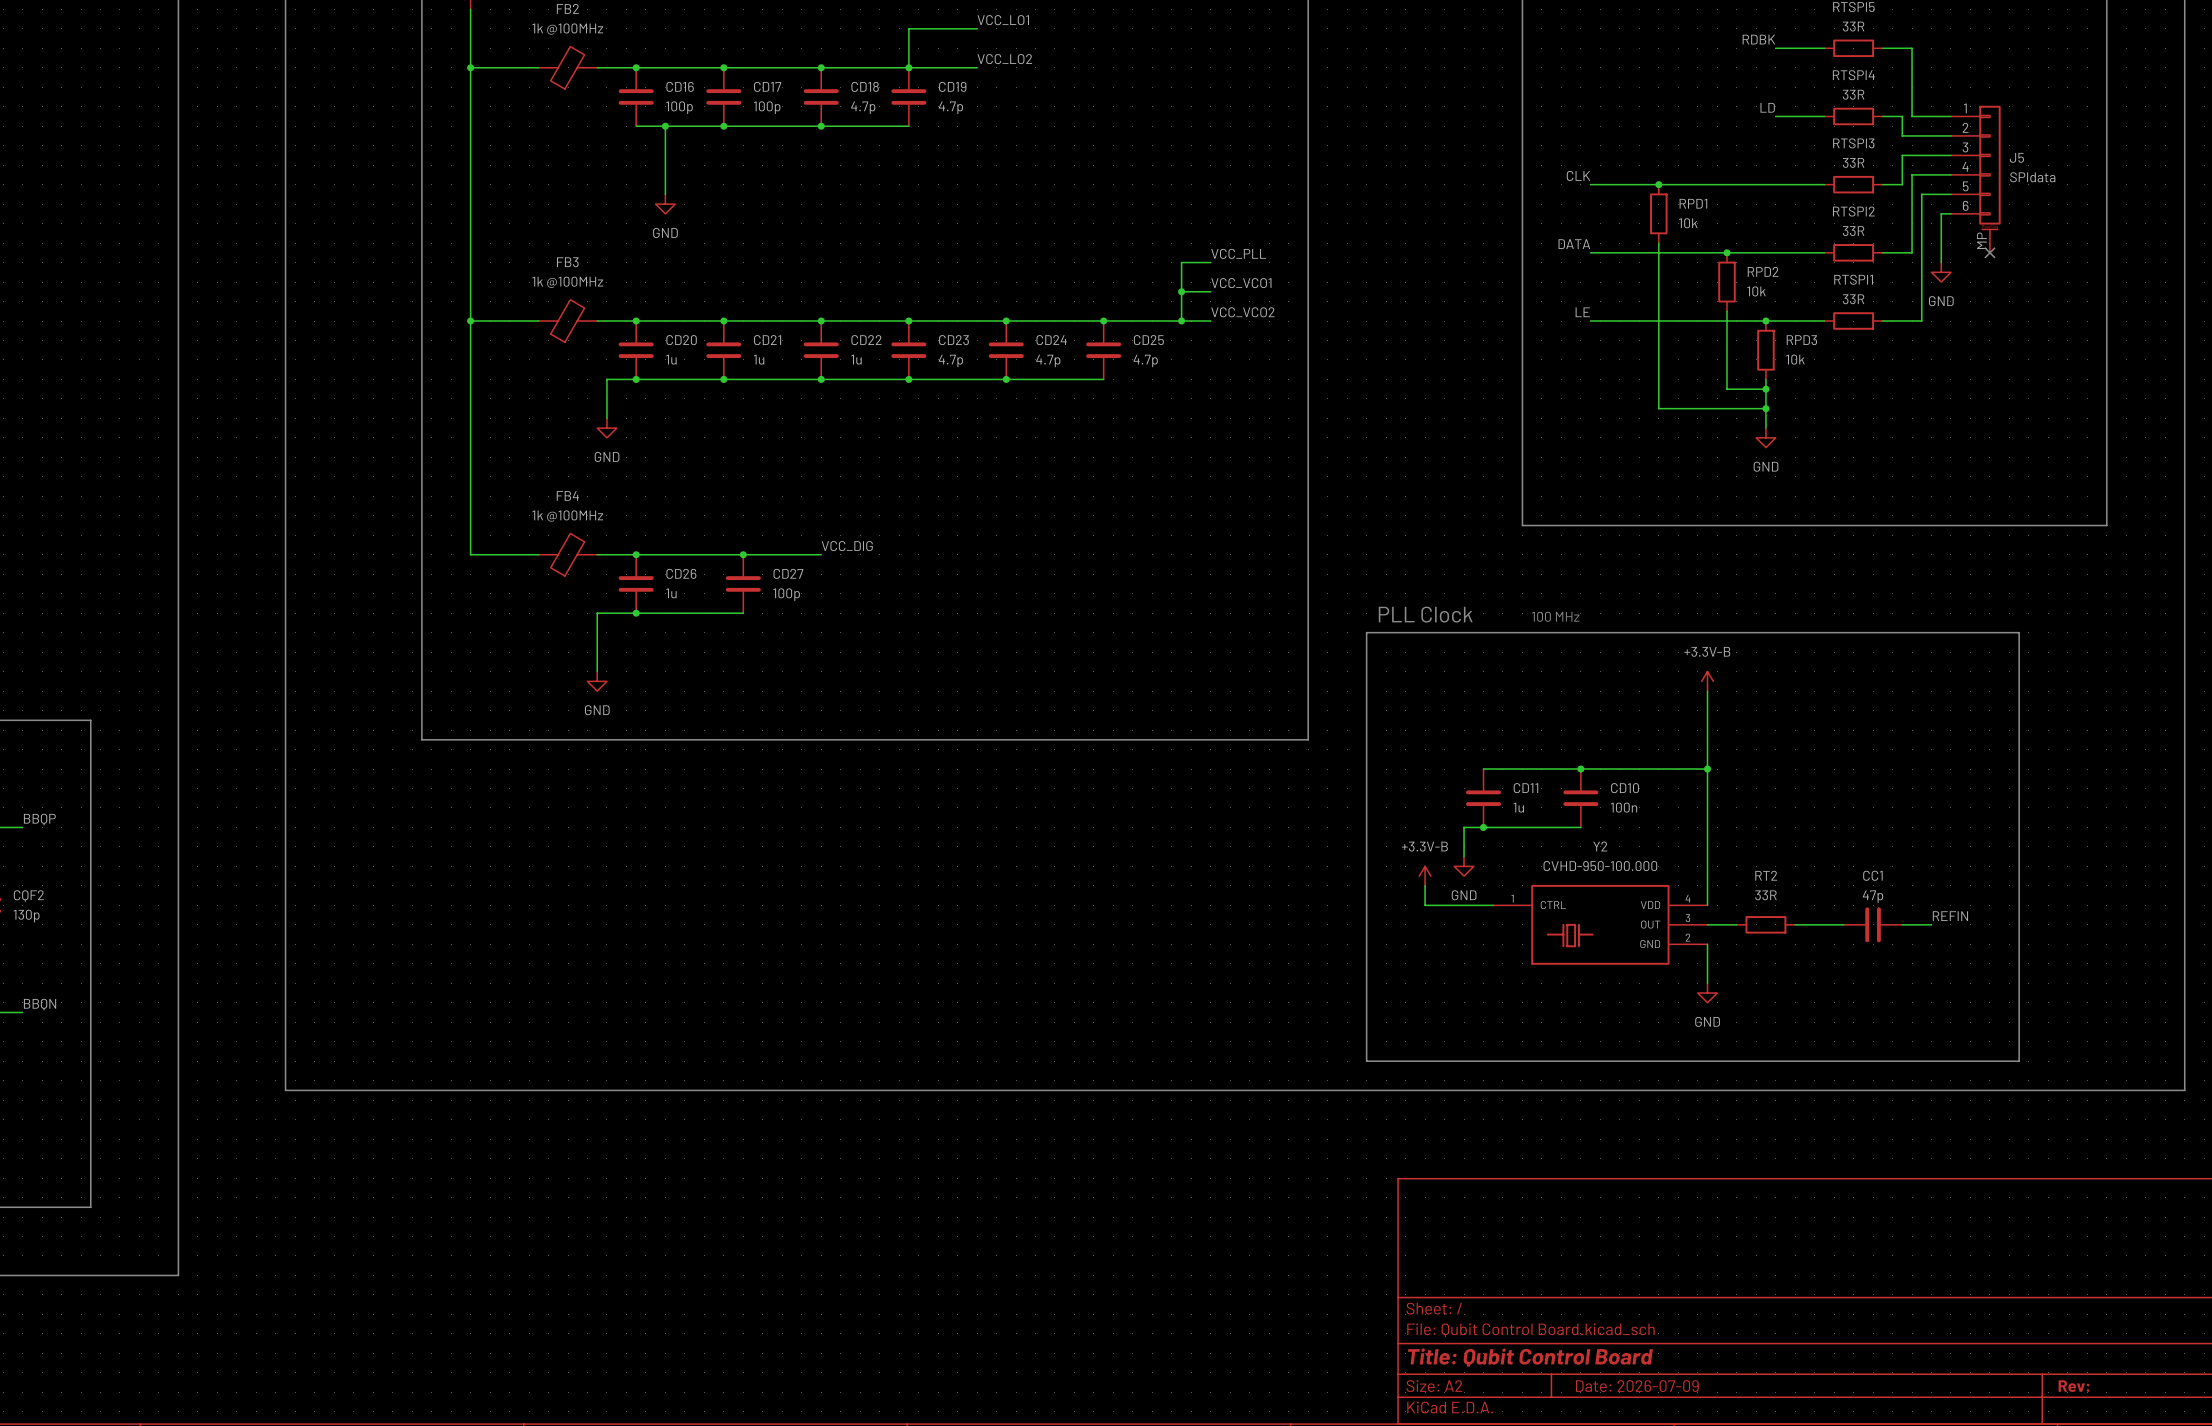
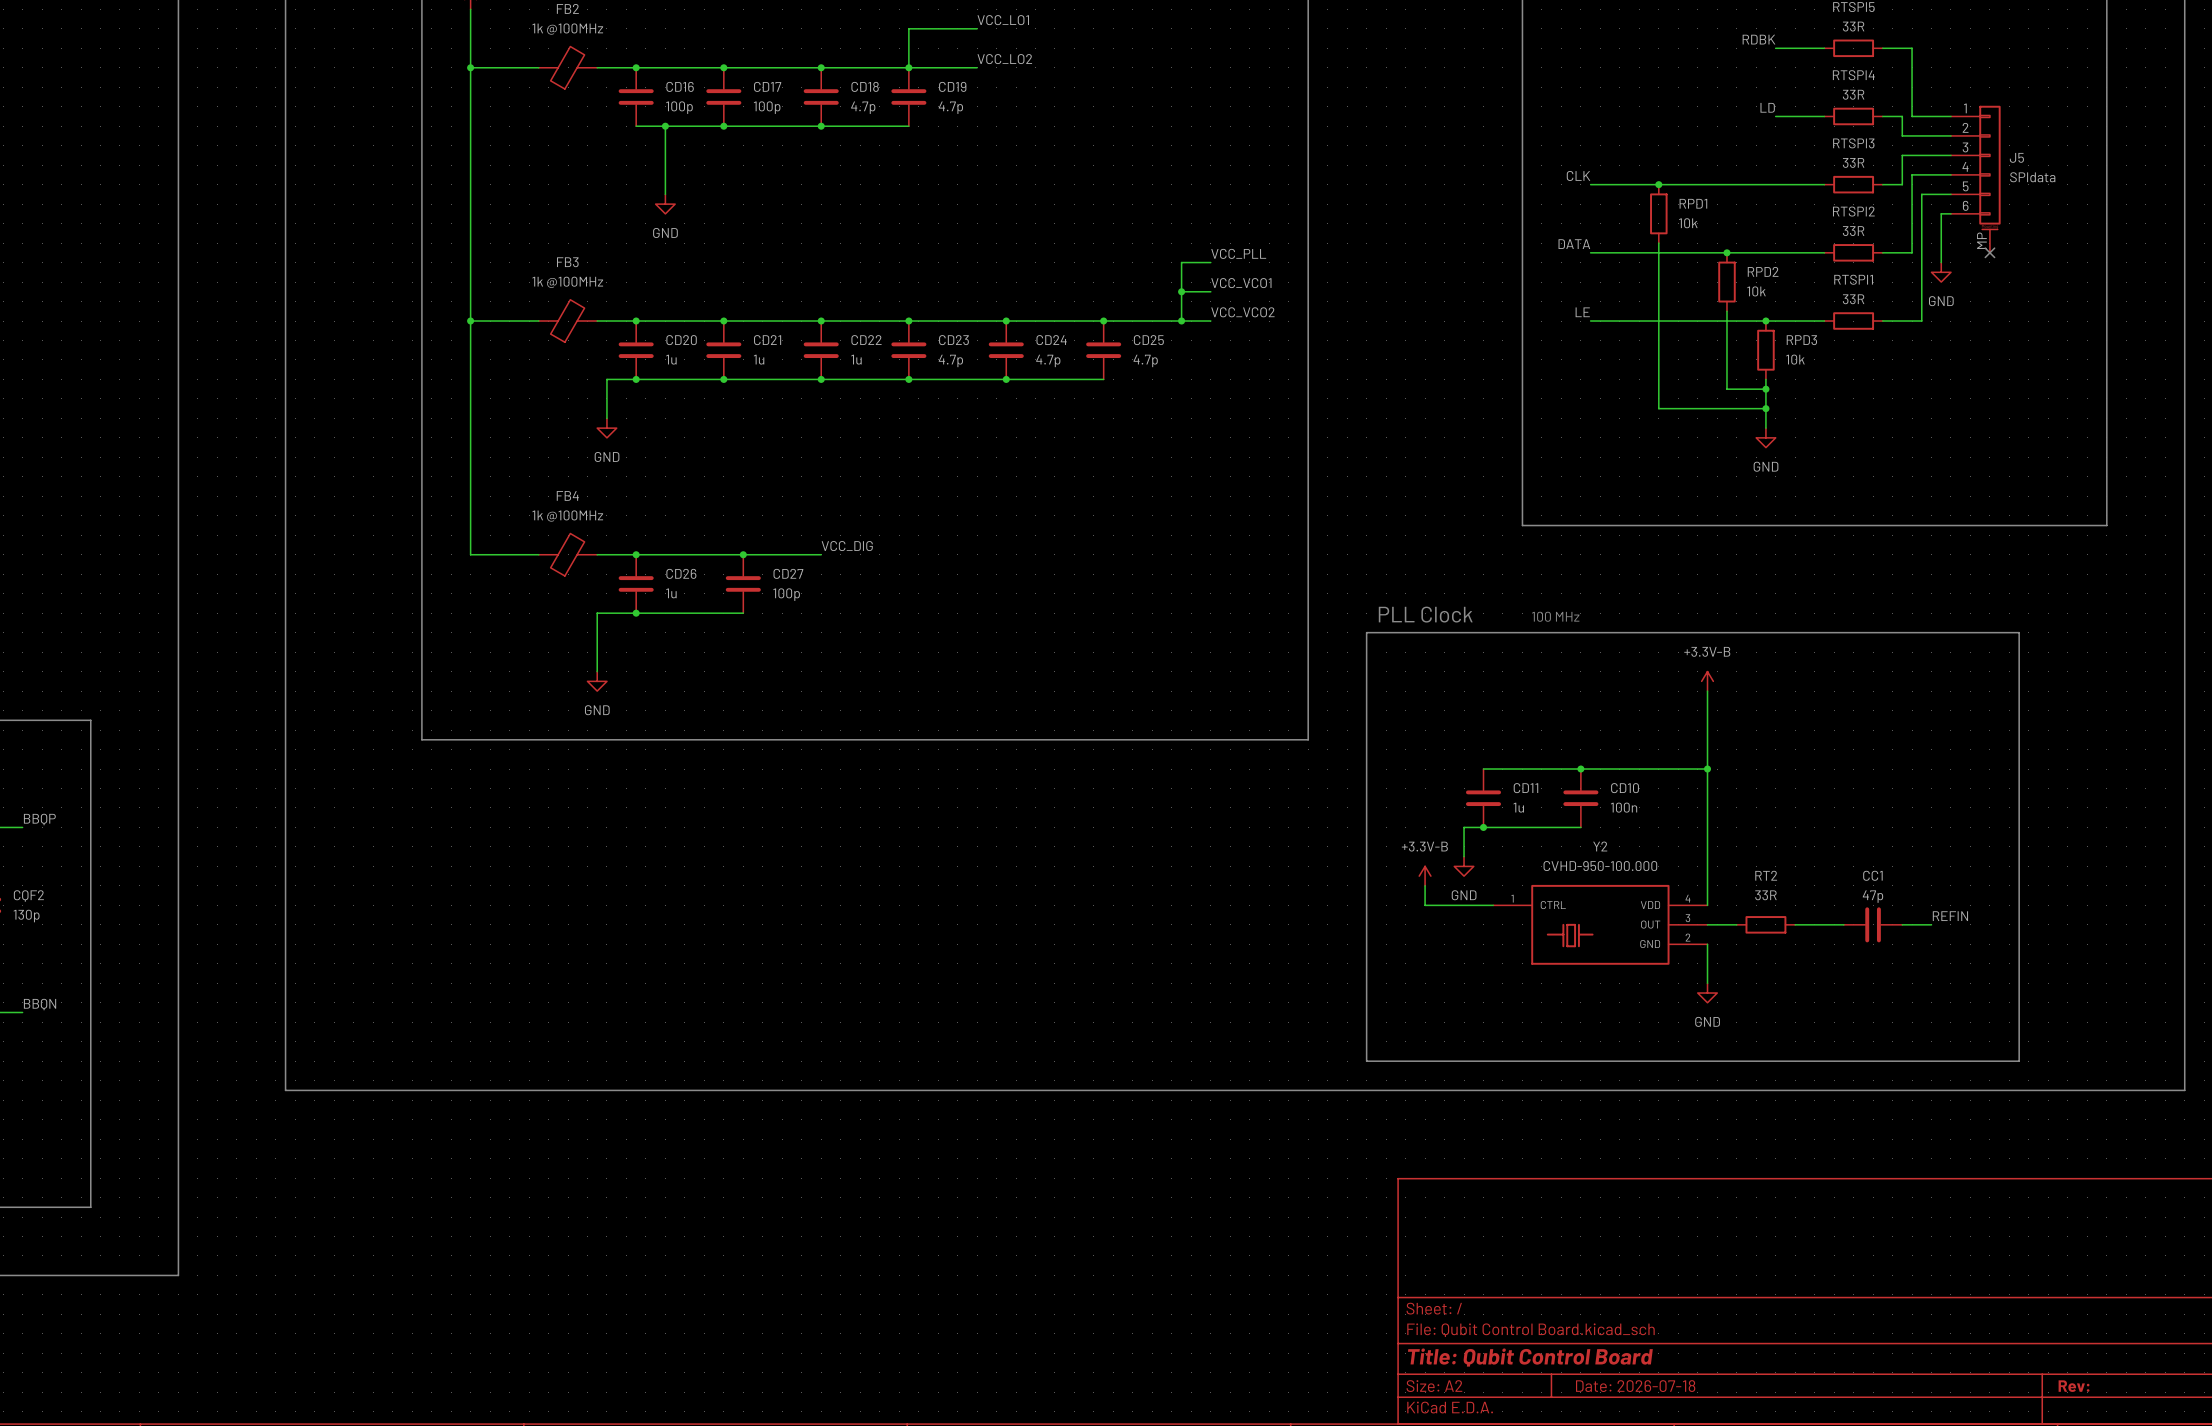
title block: Date: 2026-07-09 (1637, 1386) -> Date: 2026-07-18 (1635, 1386)

